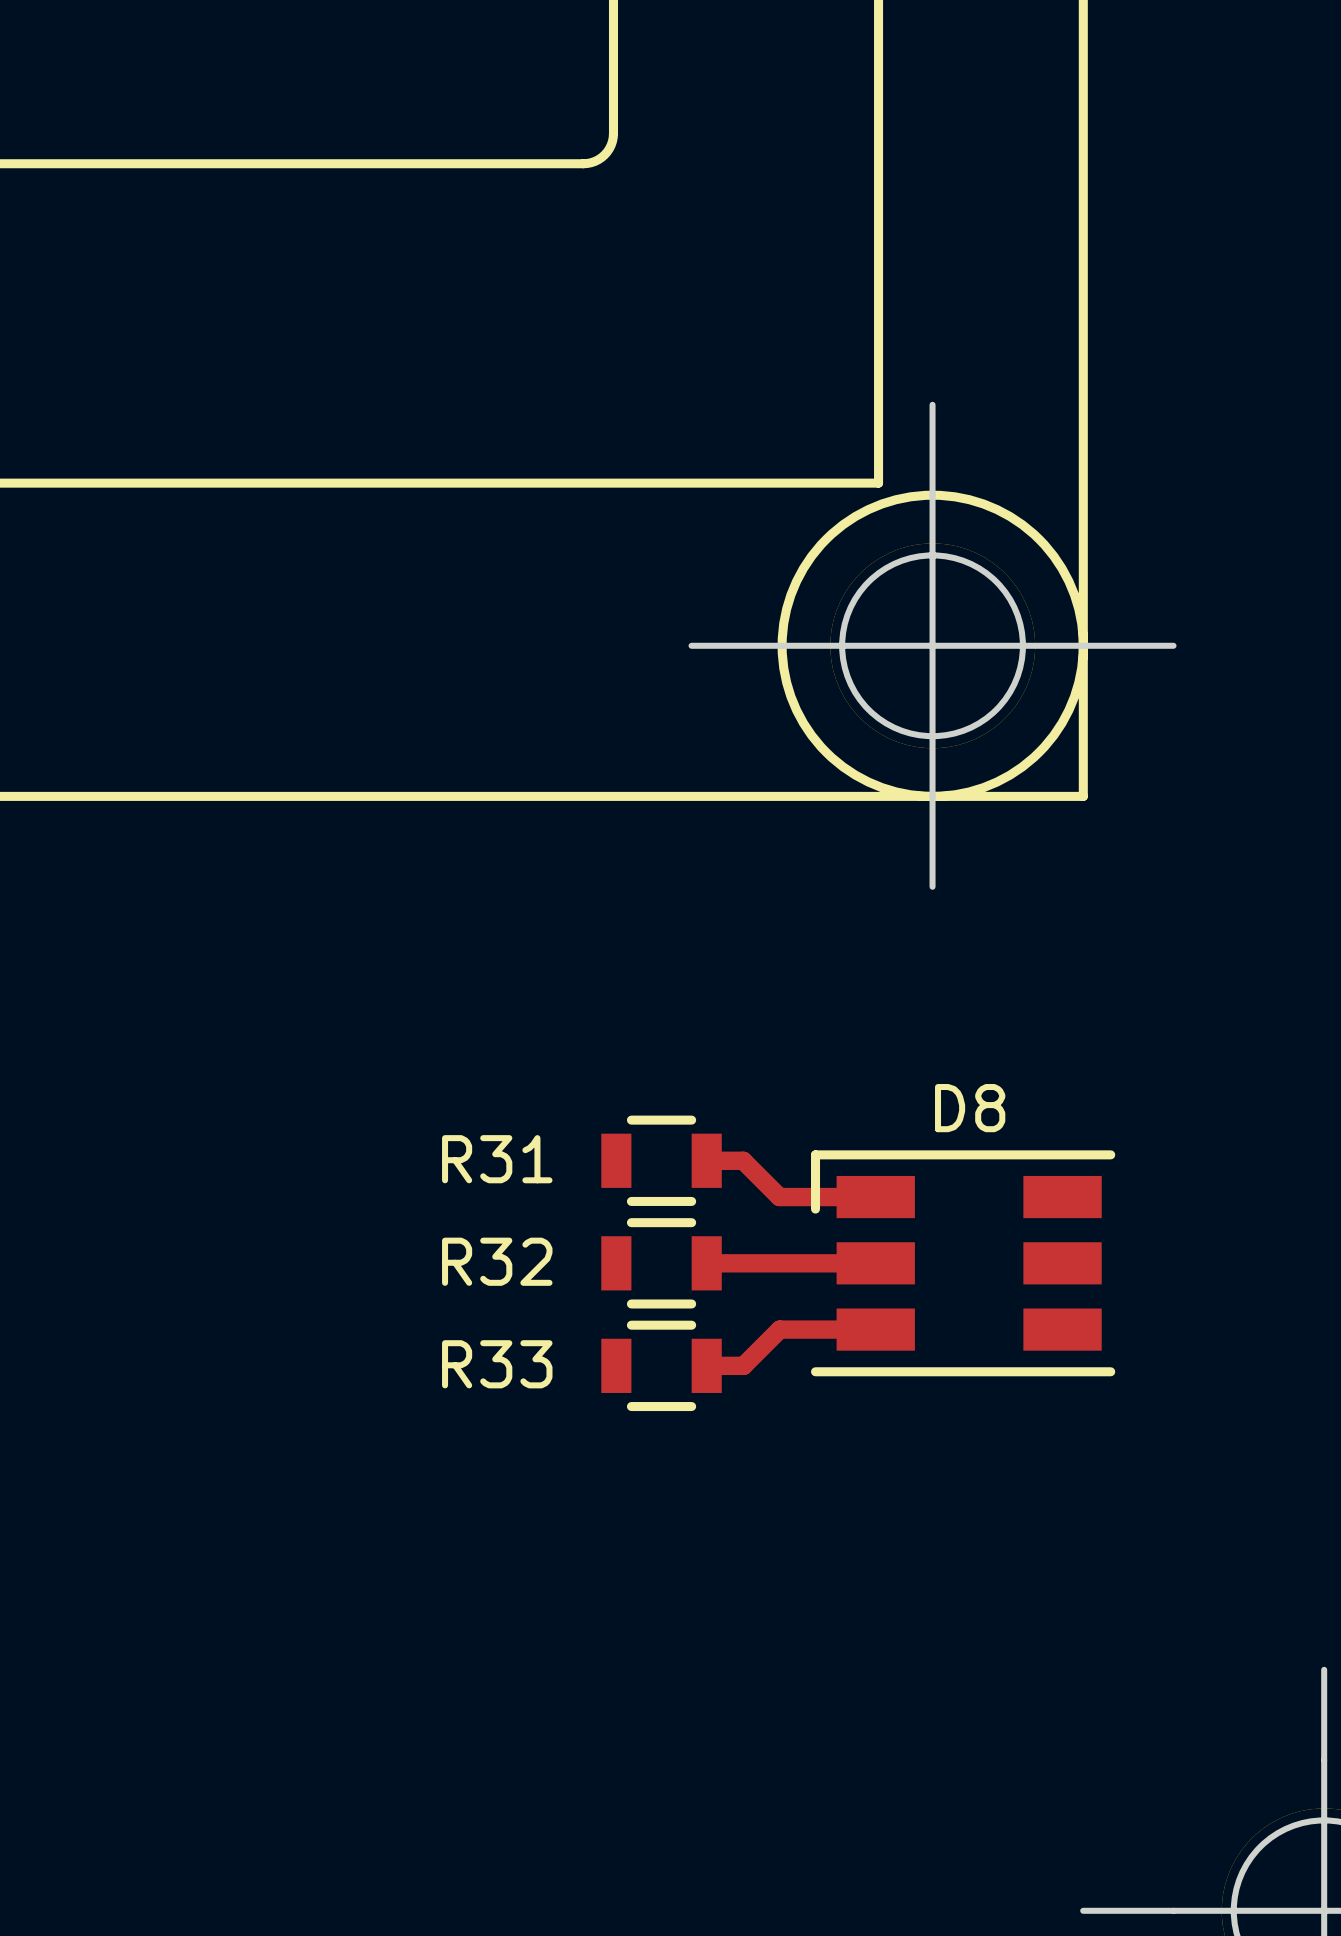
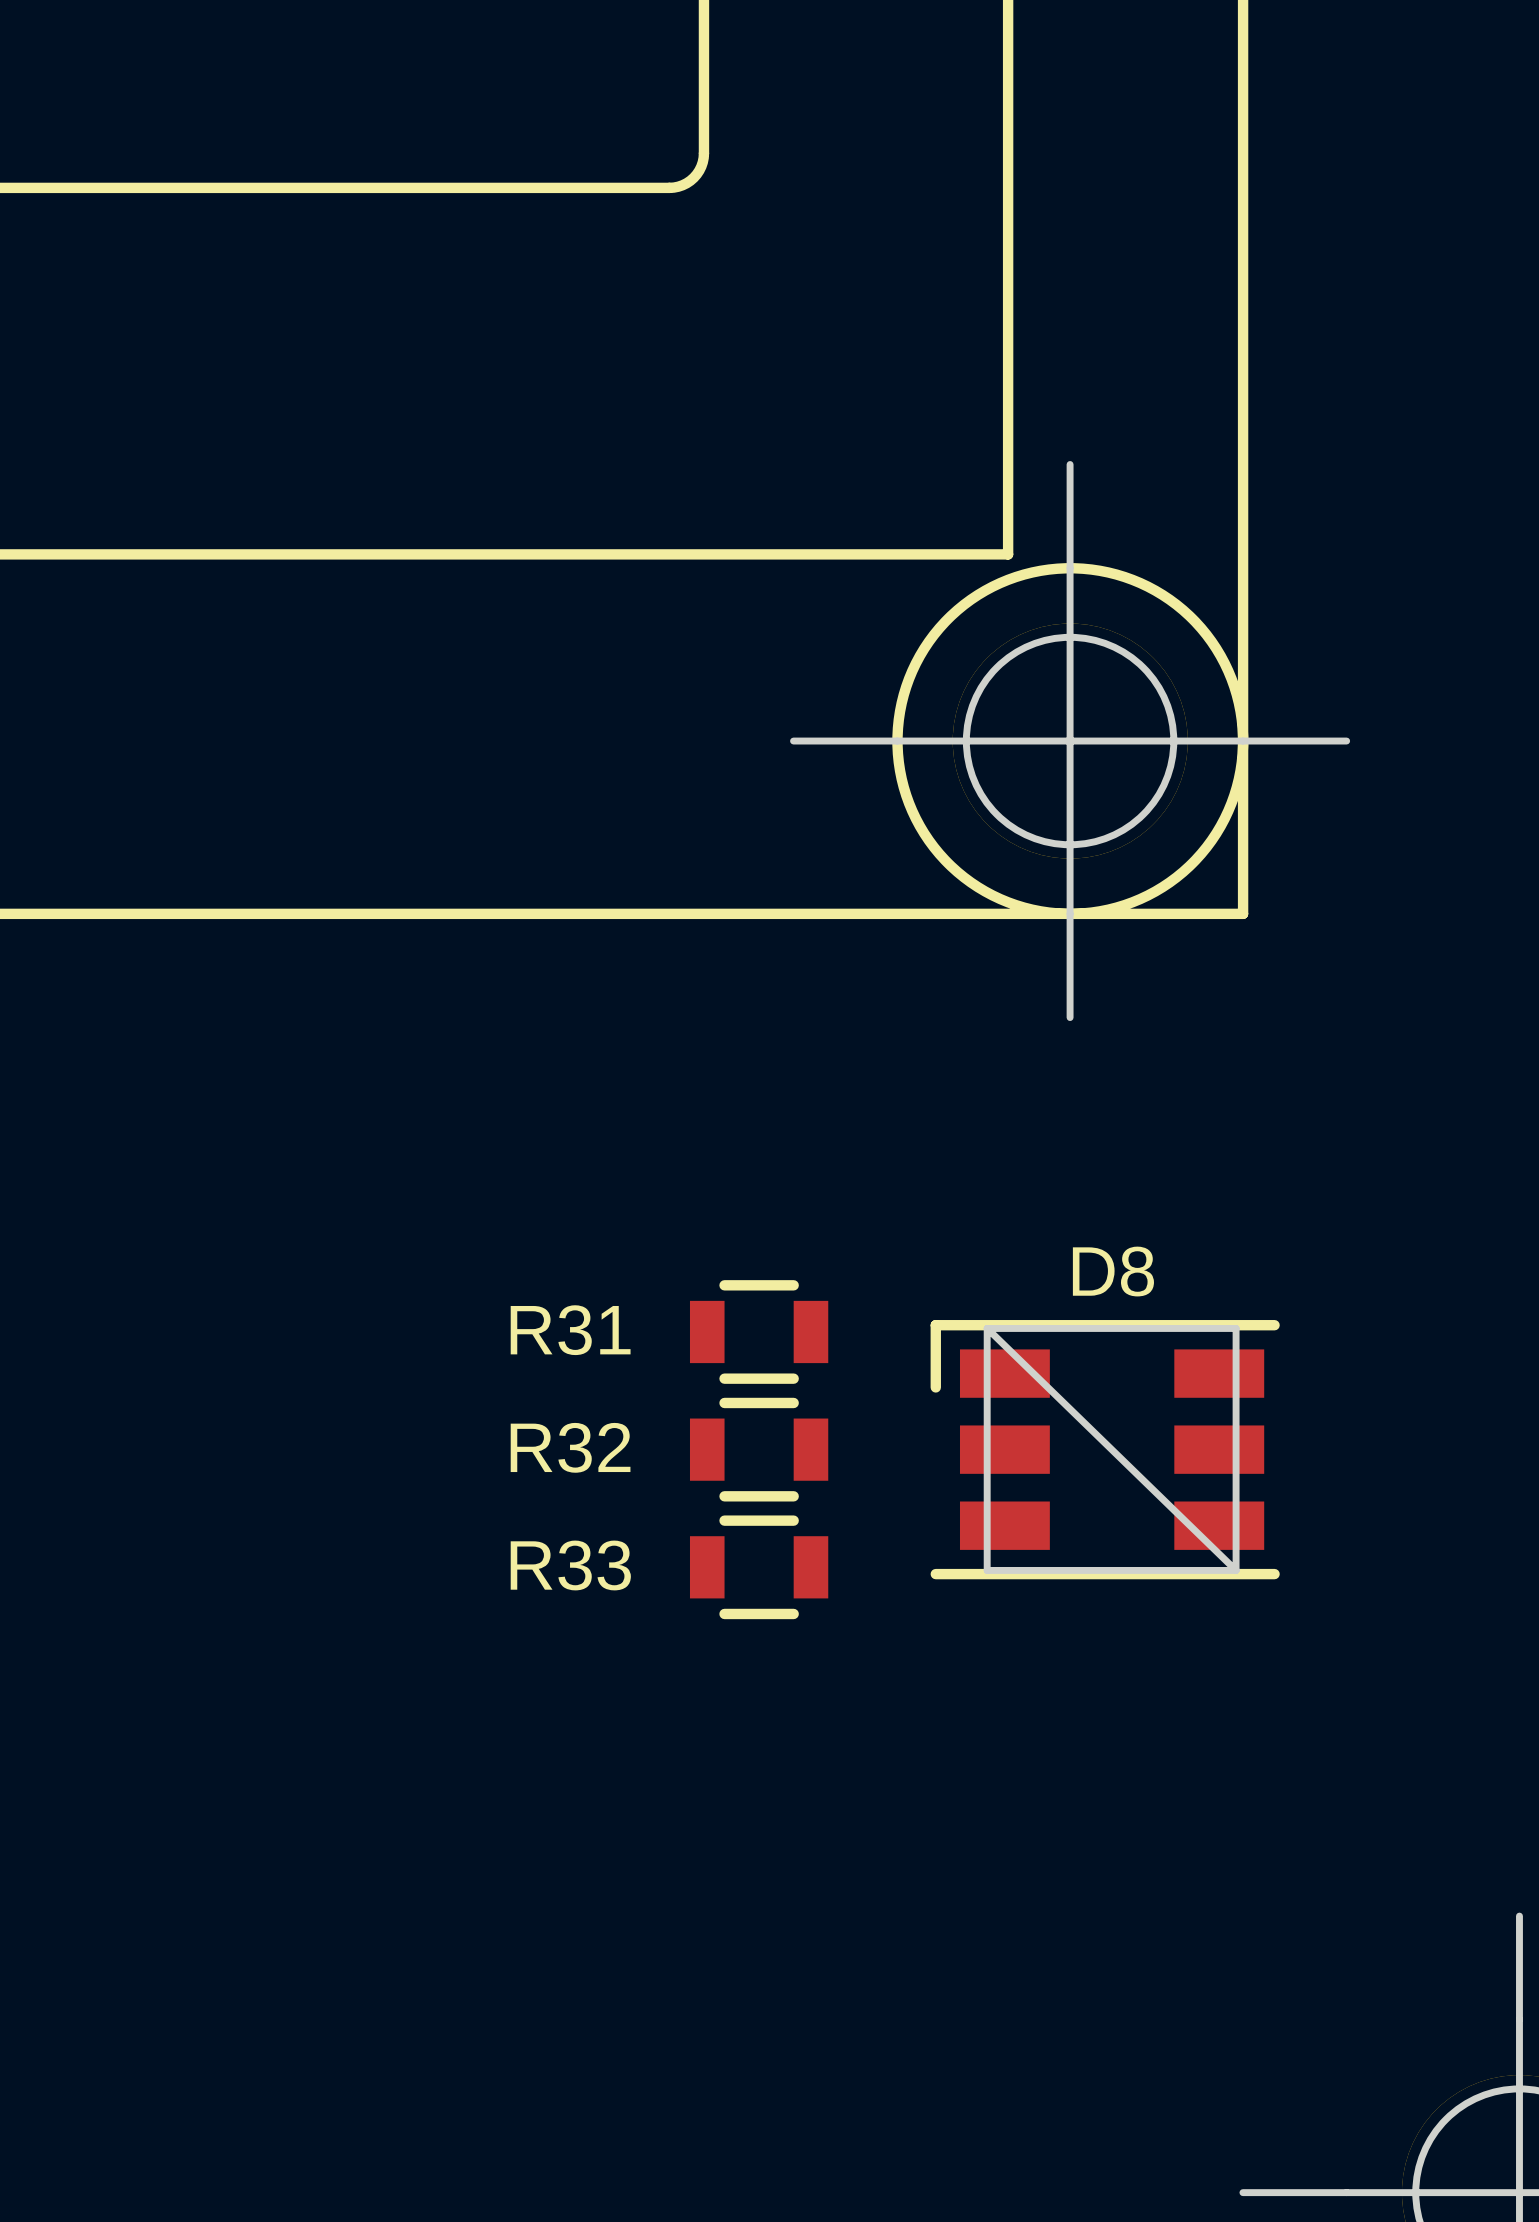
board edge: none -> (987, 1328) (987, 1570) (1236, 1570)
board edge: none -> (987, 1328) (1236, 1328) (1236, 1570)
board edge: none -> (987, 1328) (1236, 1570)
top track: (706, 1160) (743, 1160) (779, 1197) (875, 1197) -> none
top track: (706, 1263) (875, 1263) -> none
top track: (875, 1329) (779, 1329) (743, 1365) (706, 1365) -> none

